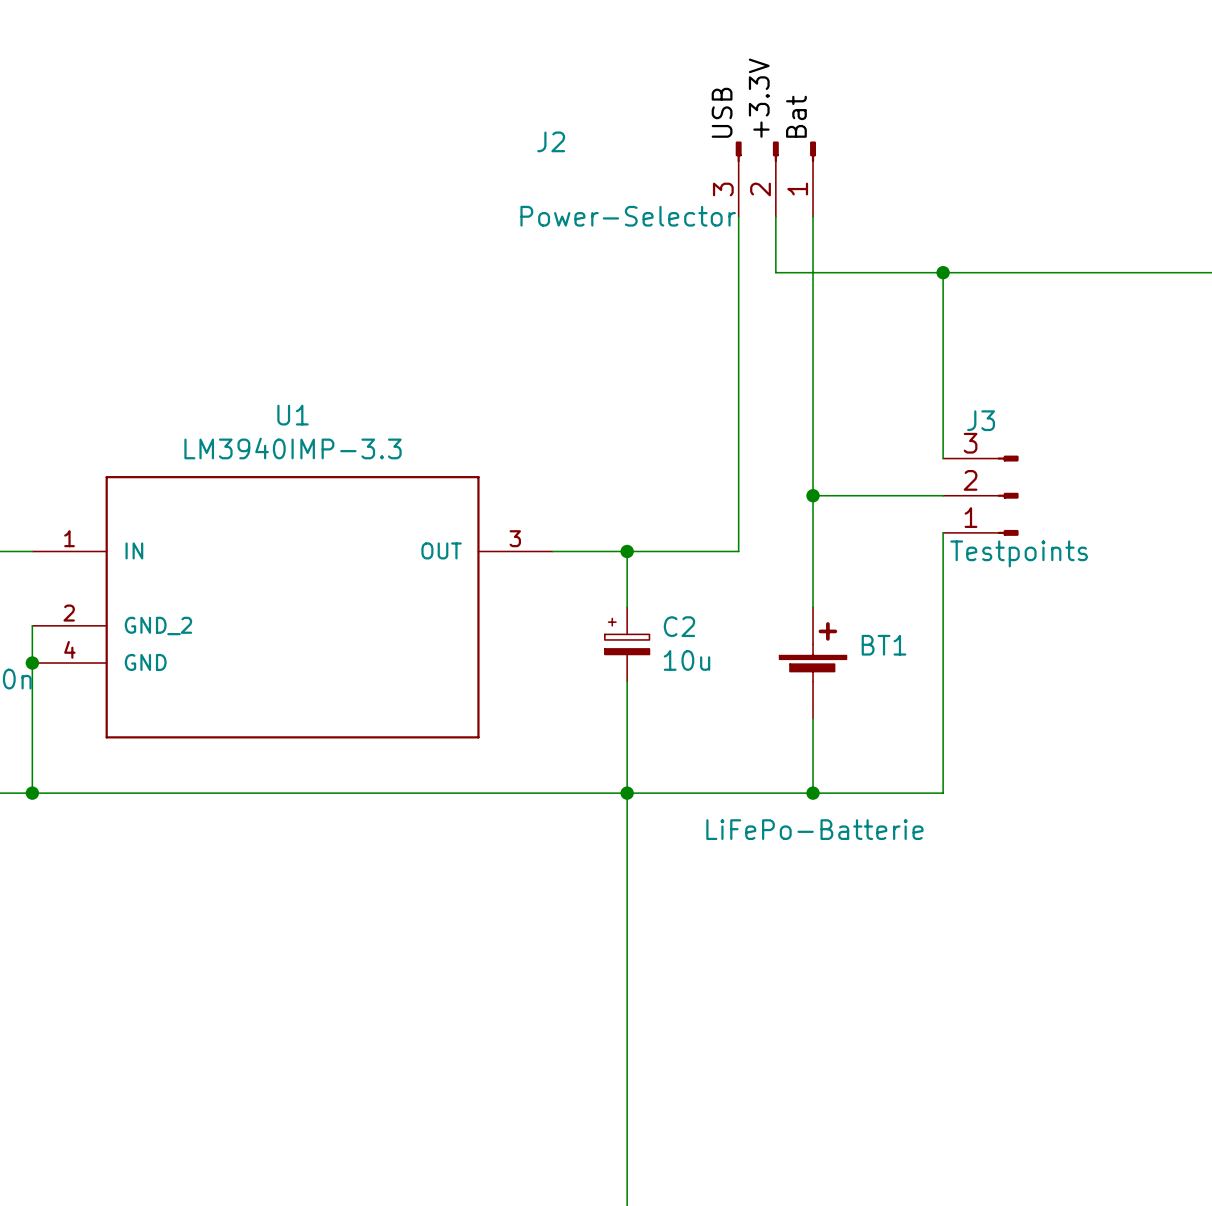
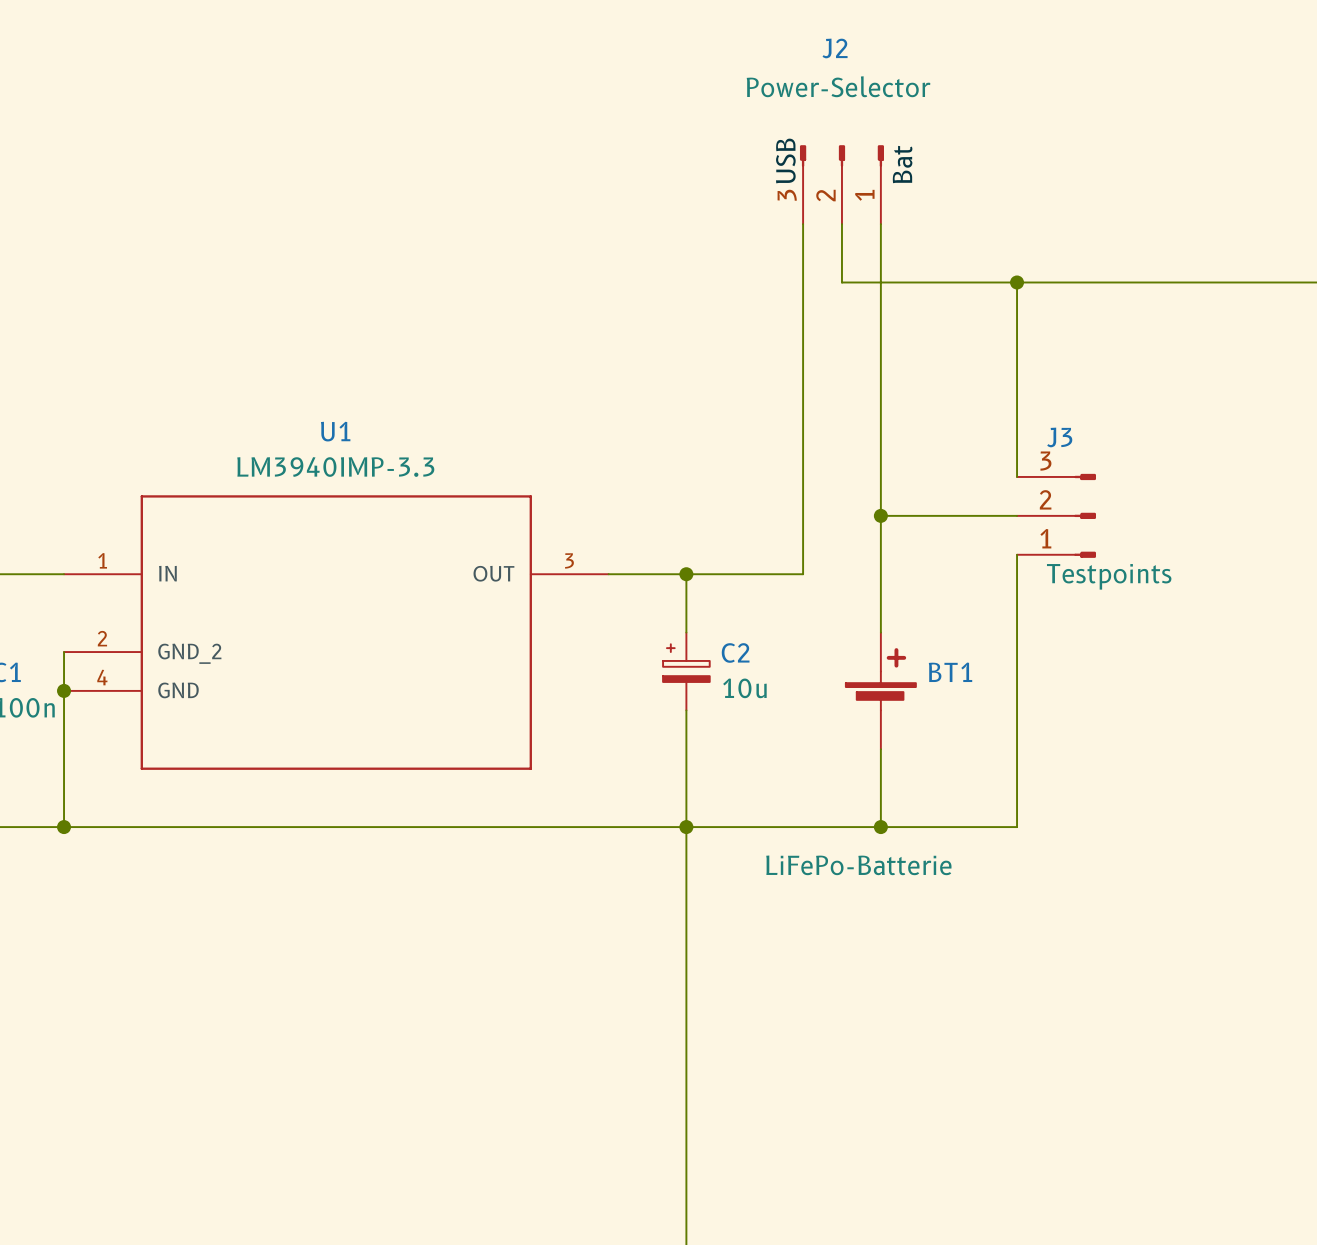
label: +3.3V (759, 98) -> none
label position: USB (722, 112) -> USB (785, 160)
label position: Bat (796, 116) -> Bat (902, 164)
J2 name position: J2 (551, 141) -> J2 (835, 48)
J2 value position: Power-Selector (628, 216) -> Power-Selector (838, 86)

